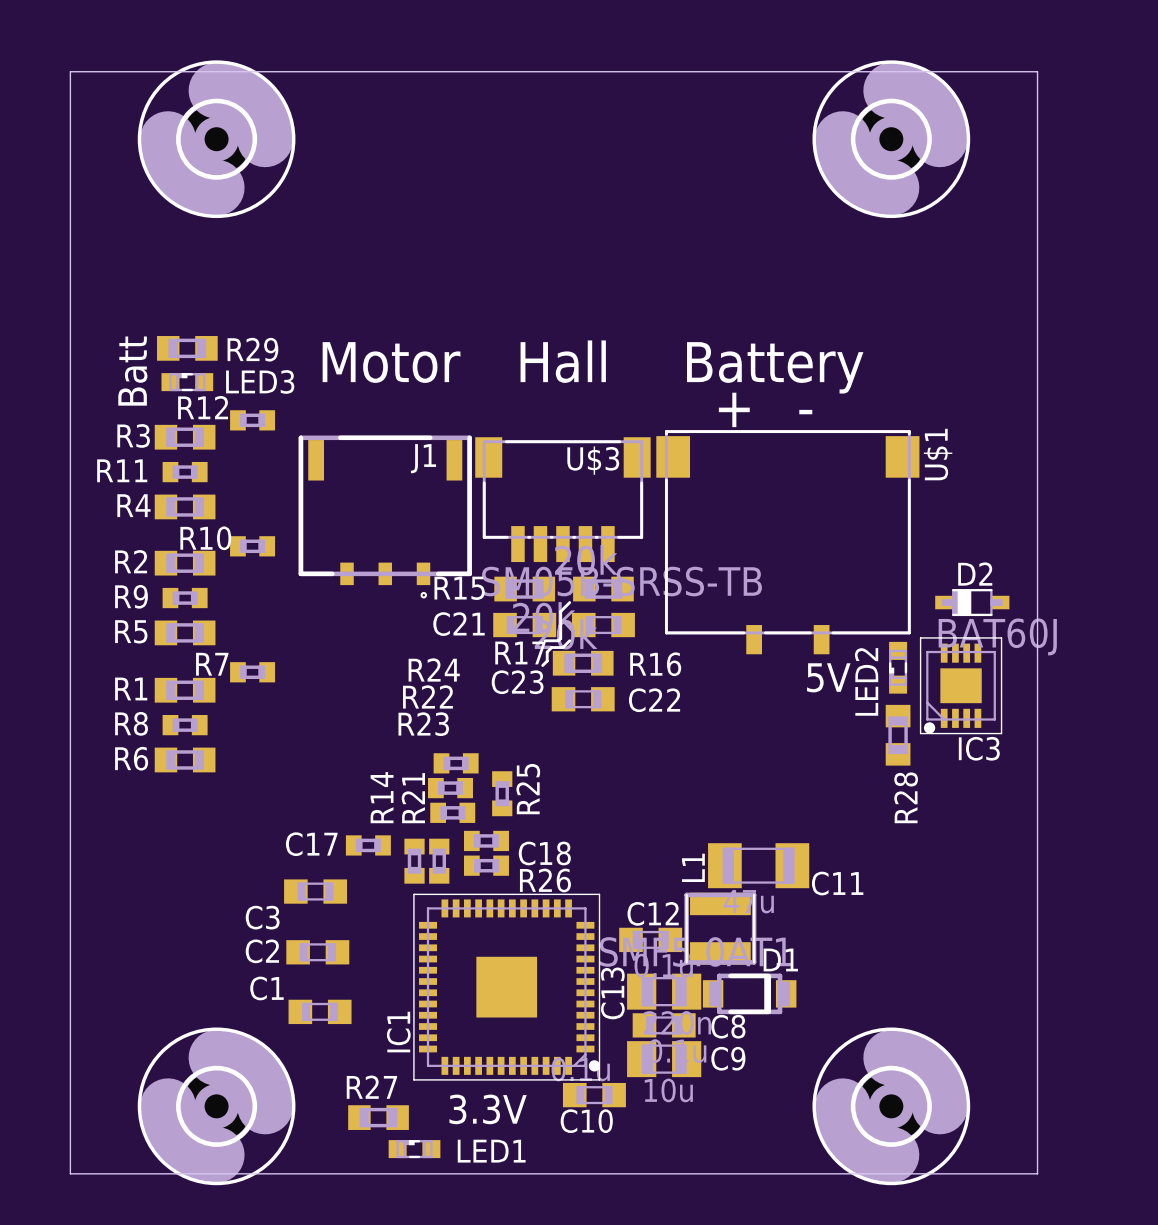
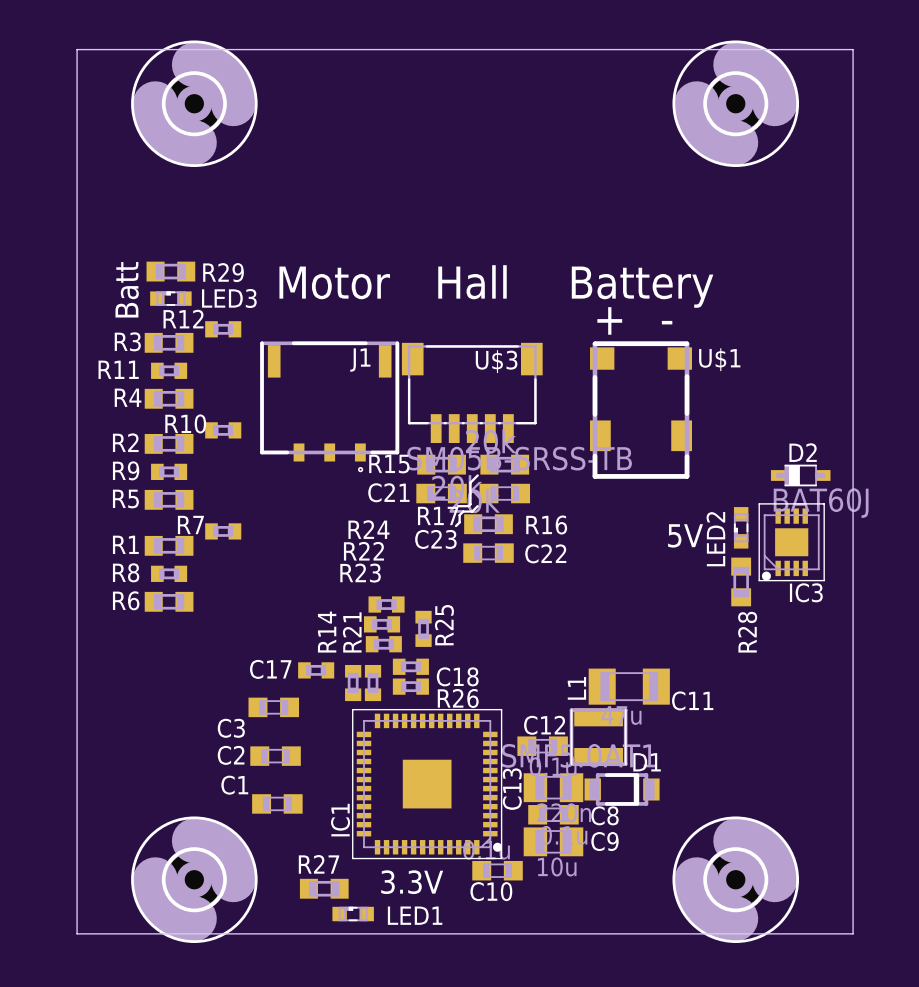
U$1 footprint: [656, 430, 920, 655] -> [590, 341, 692, 479]
U$1 name position: U$1 (938, 454) -> U$1 (719, 359)

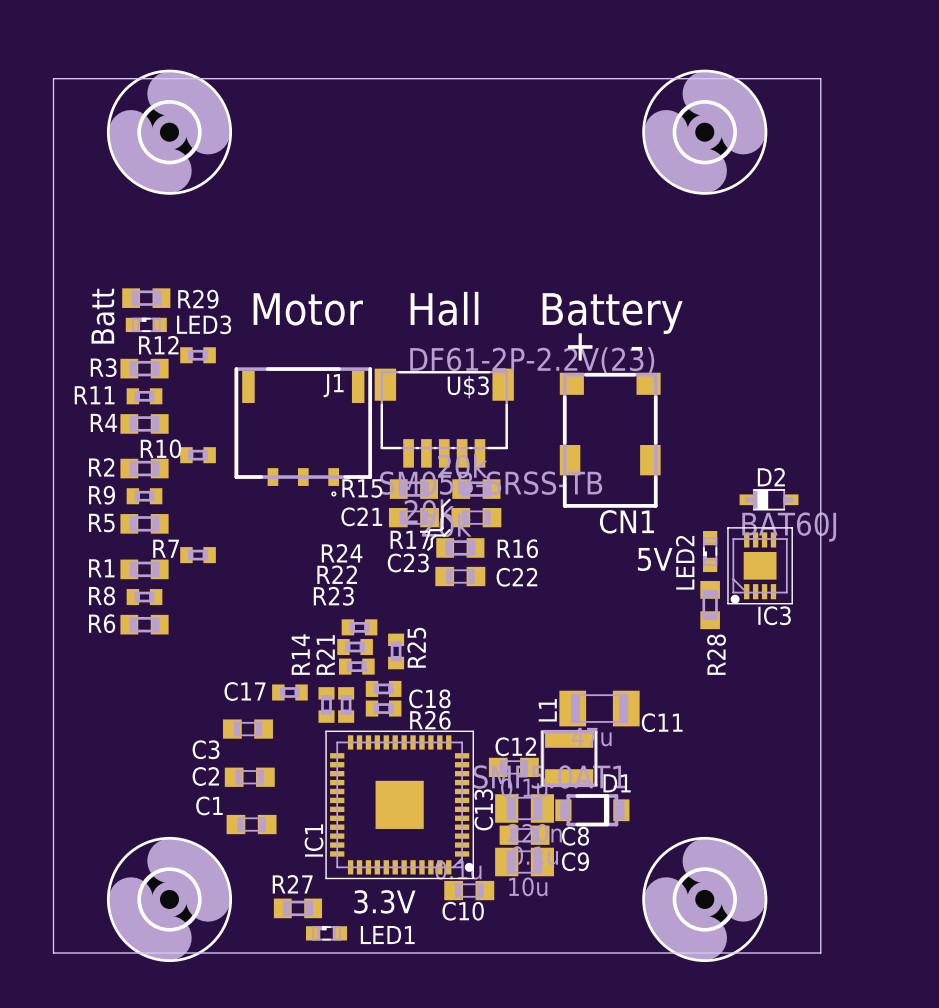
U$1: (641, 410) -> none
CN1: none -> DF61-2P-2.2V(23) (610, 440)

